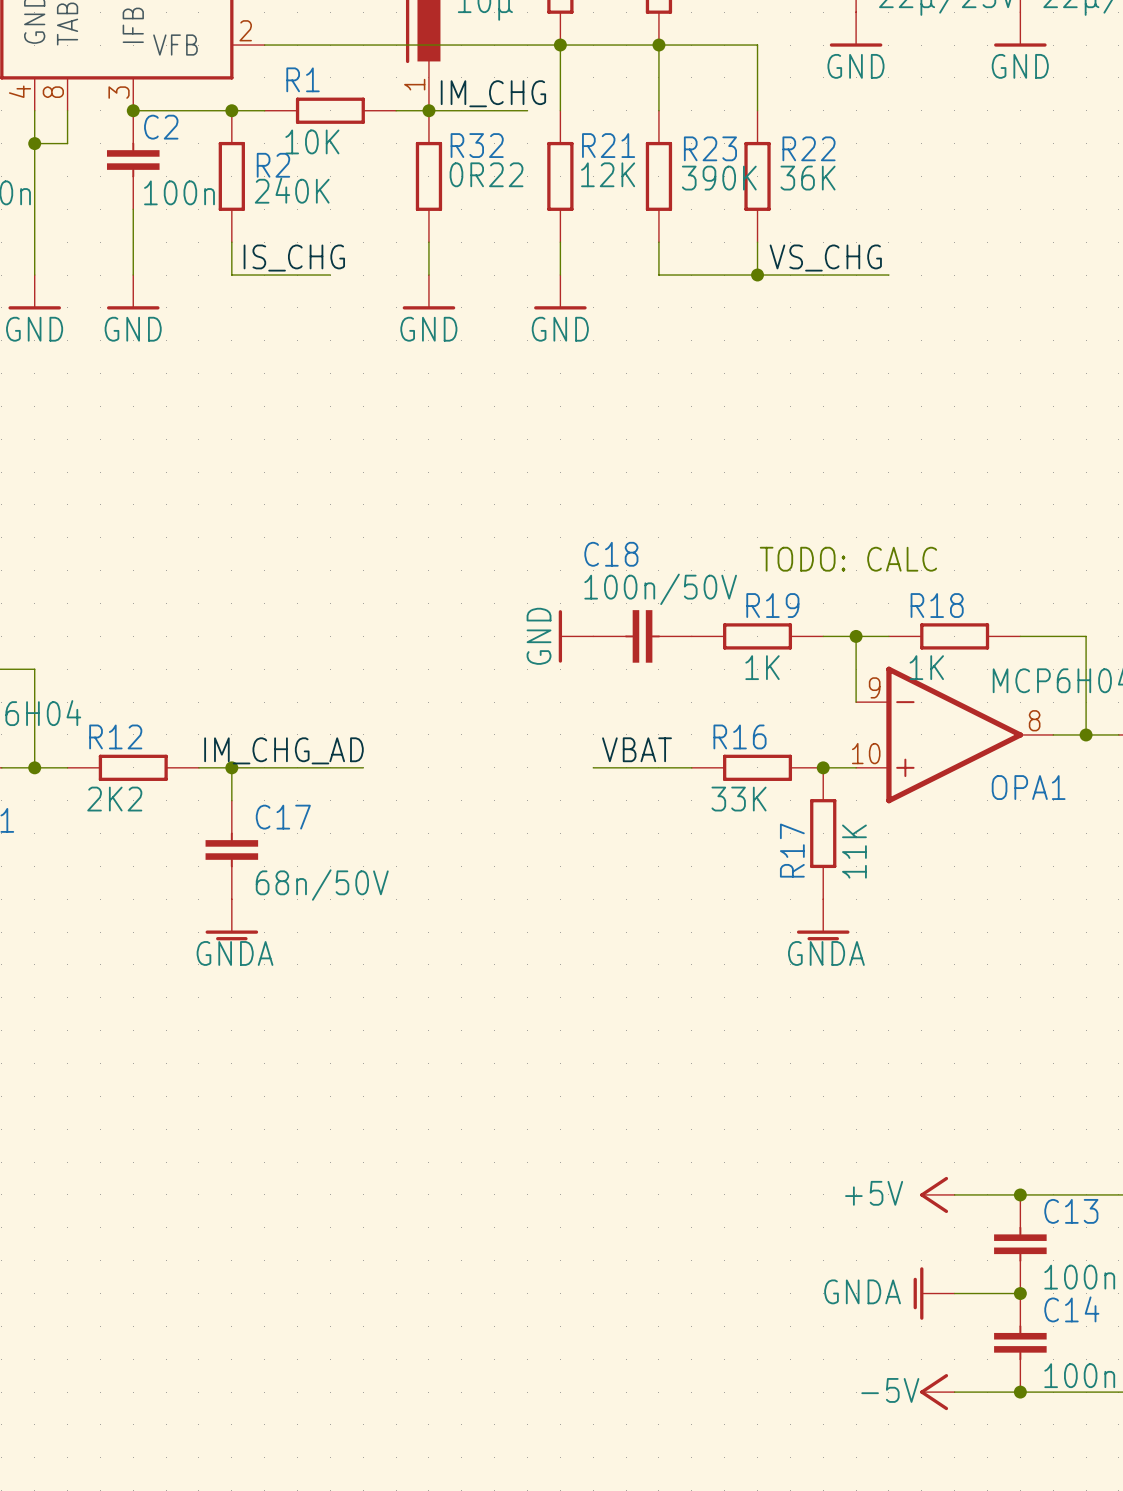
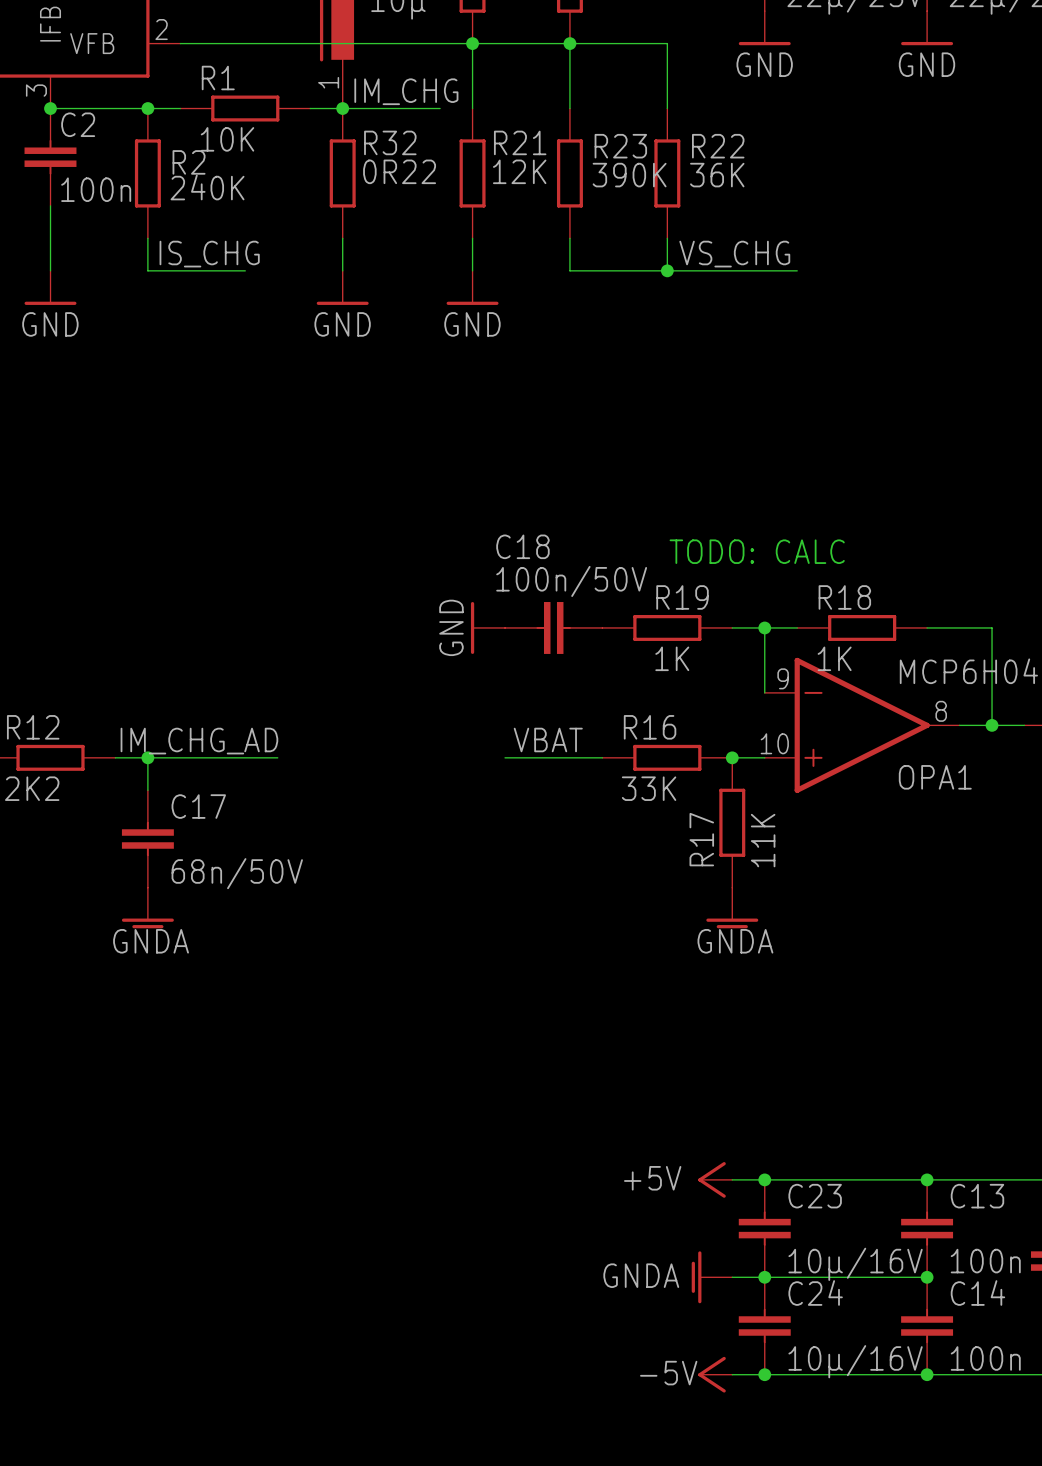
wire: none -> (732, 1179) (862, 1179)
junction: none -> (764, 1179)
power symbol position: +5V (937, 1194) -> +5V (715, 1179)
C23: none -> 10µ/16V (764, 1228)
wire: none -> (732, 1277) (862, 1277)
junction: none -> (764, 1277)
power symbol position: GNDA (934, 1293) -> GNDA (712, 1277)
C24: none -> 10µ/16V (764, 1326)
wire: none -> (732, 1374) (862, 1374)
junction: none -> (764, 1374)
power symbol position: -5V (937, 1392) -> -5V (715, 1374)

